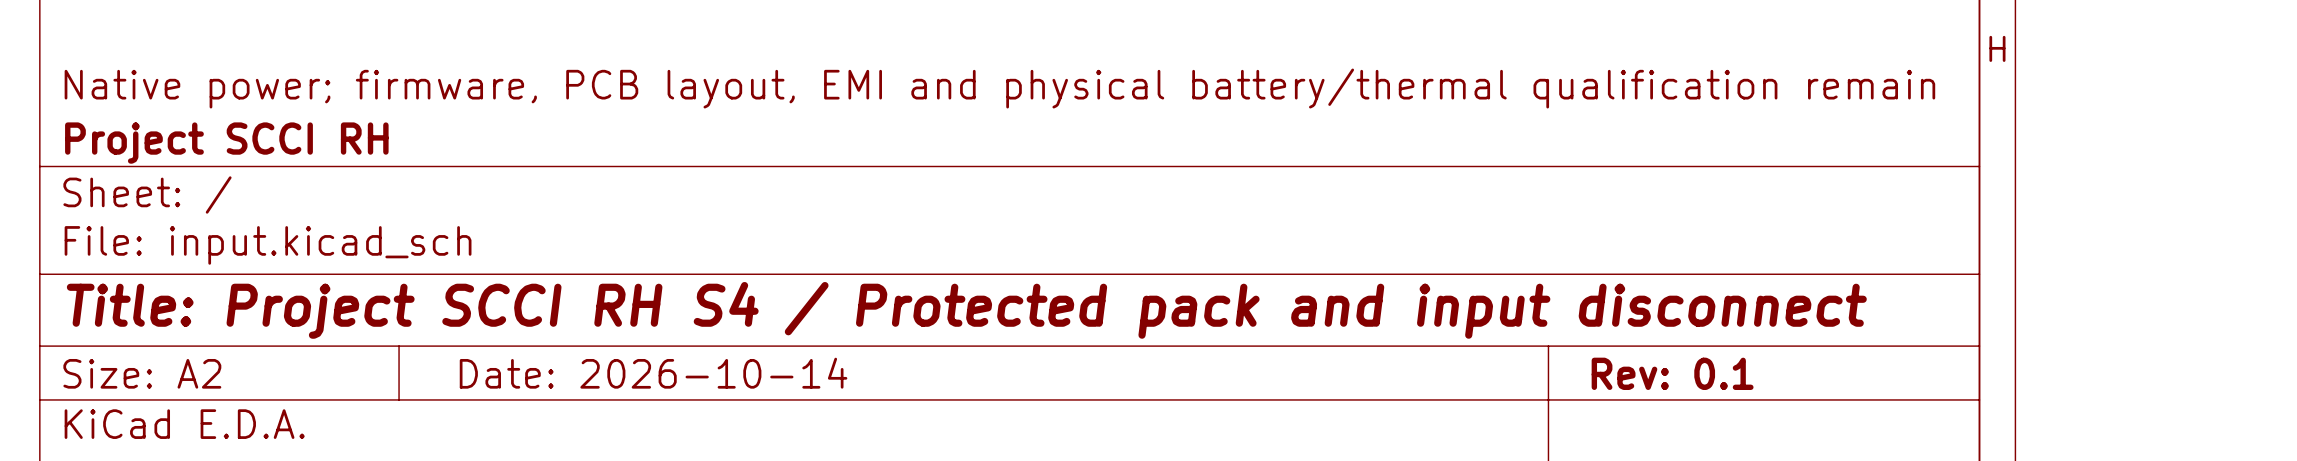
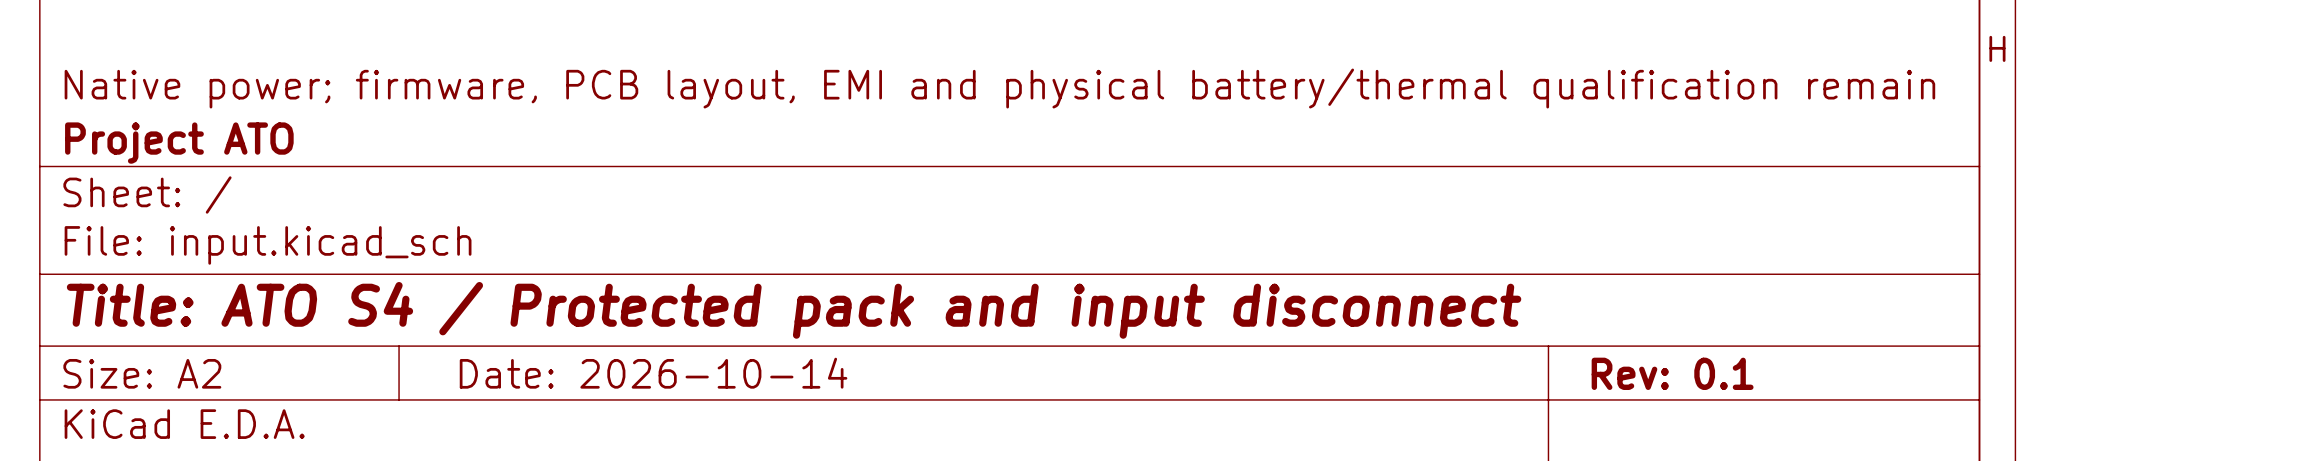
title block: Project SCCI RH (226, 143) -> Project ATO (179, 143)
title block: Title: Project SCCI RH S4 / Protected pack and input disconnect (966, 310) -> Title: ATO S4 / Protected pack and input disconnect (794, 310)

